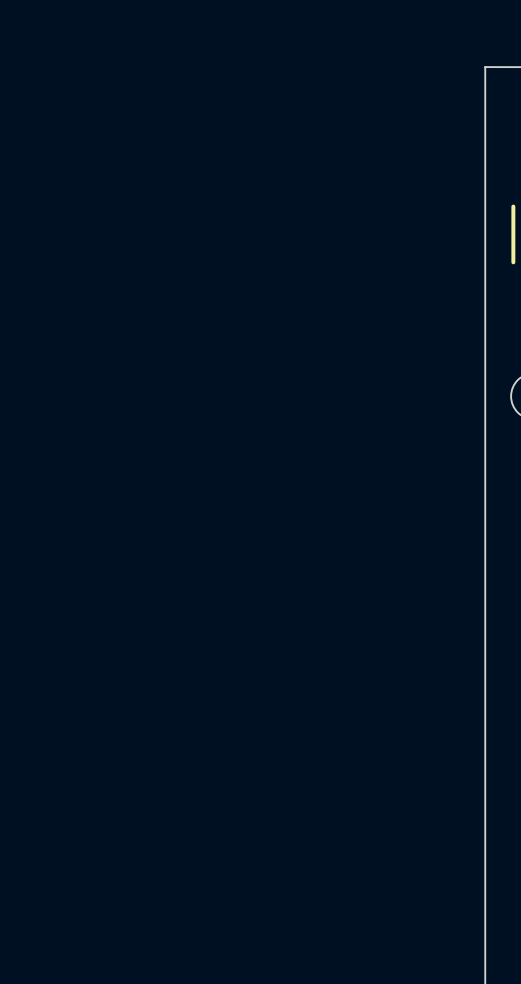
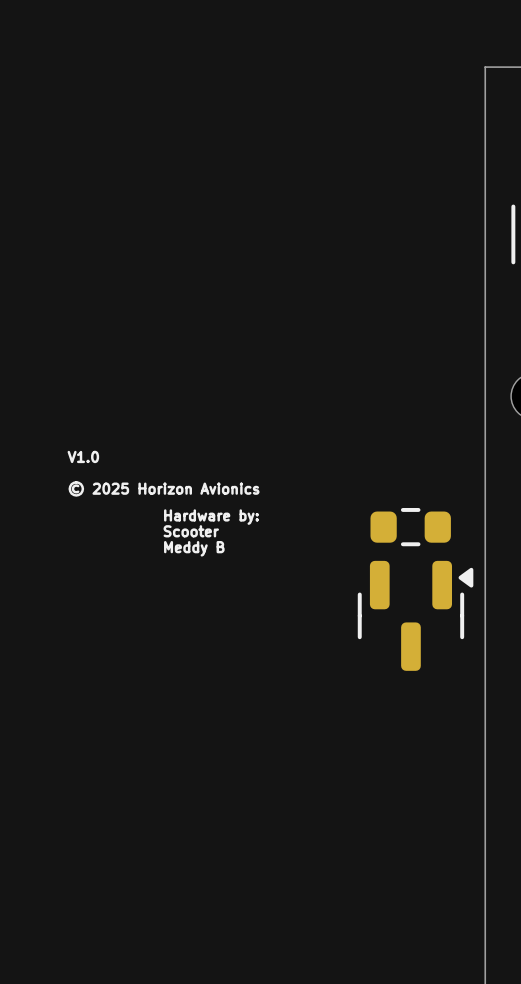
text: none -> V1.0 (83, 456)
text: none -> © 2025 Horizon Avionics (164, 488)
text: none -> Hardware by: (211, 517)
part: none -> (410, 527)
text: none -> Scooter (191, 531)
text: none -> Meddy B (194, 548)
part: none -> (415, 615)

